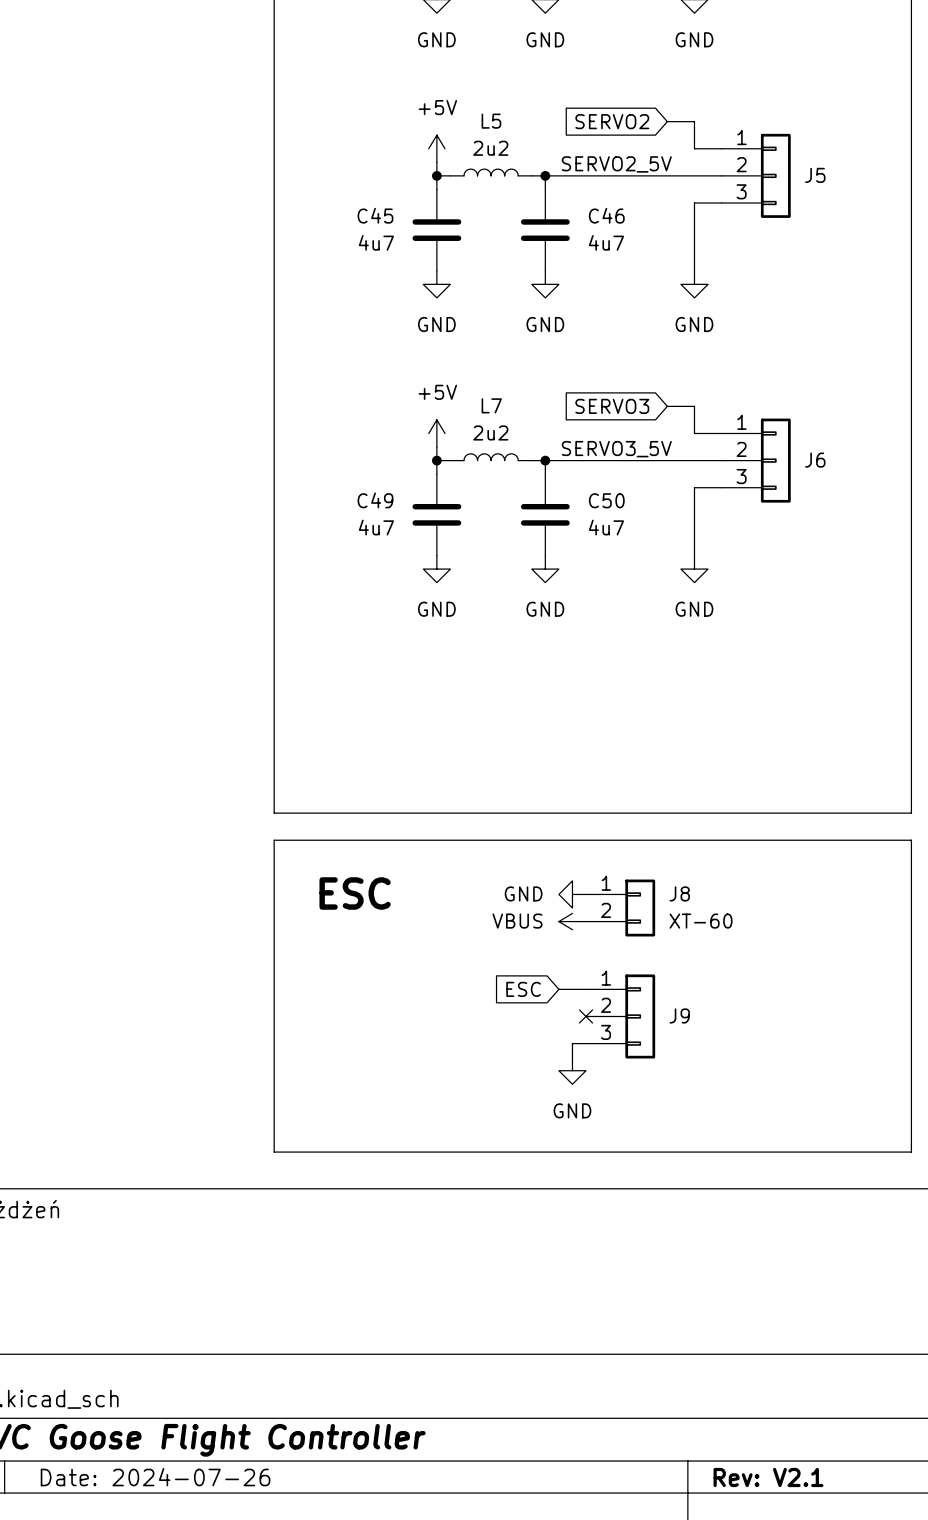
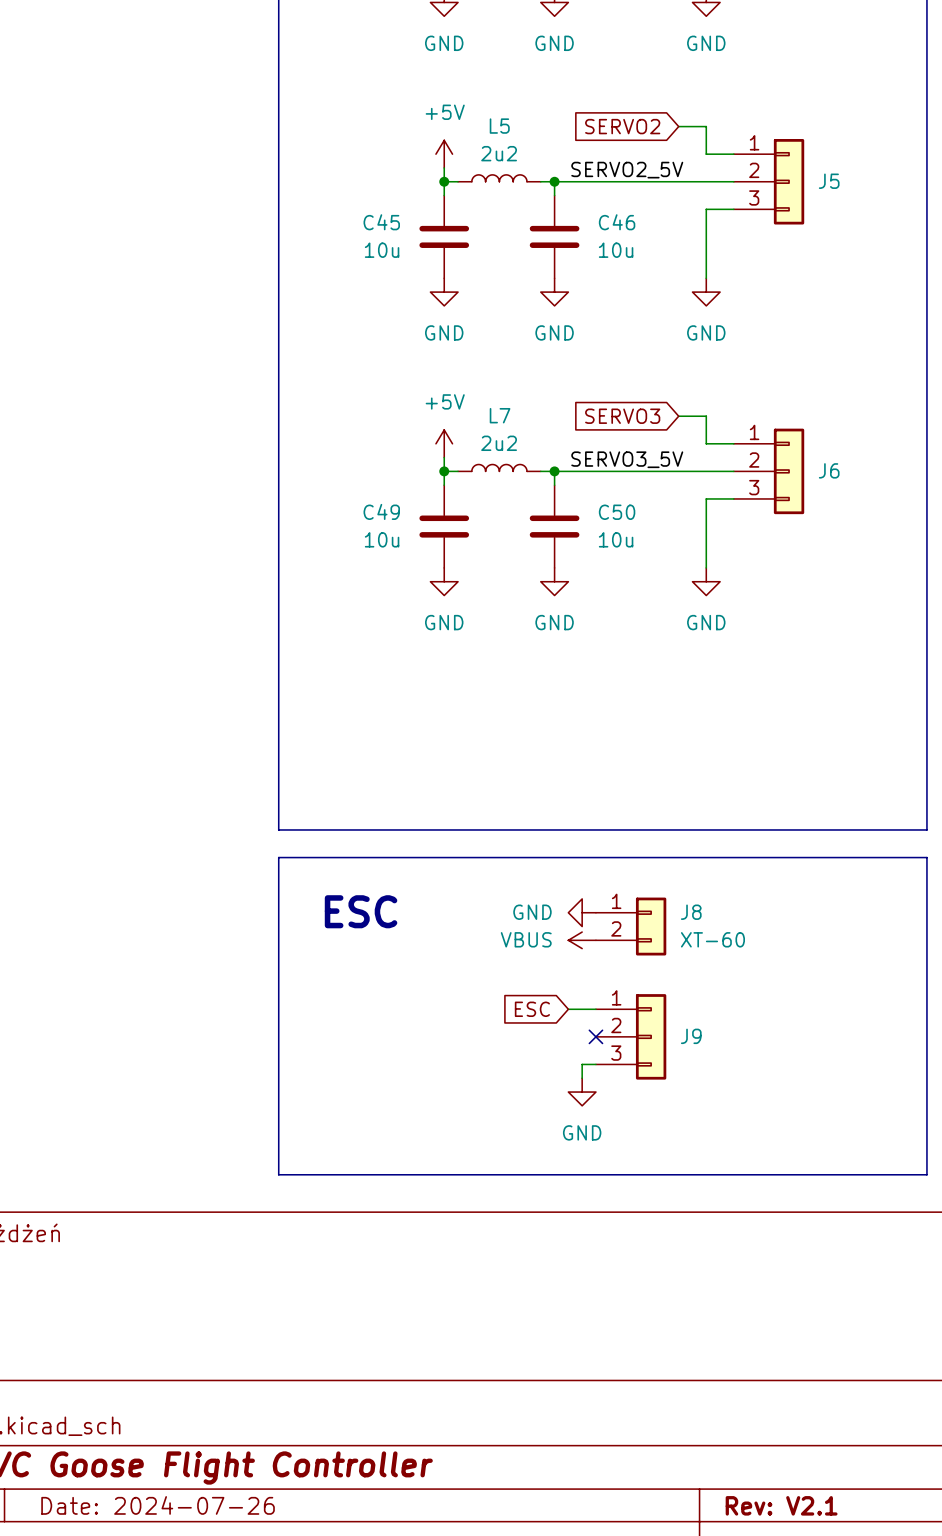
C45 value: 4u7 (376, 242) -> 10u (382, 250)
C46 value: 4u7 (606, 242) -> 10u (616, 250)
C49 value: 4u7 (376, 527) -> 10u (382, 539)
C50 value: 4u7 (606, 527) -> 10u (616, 539)

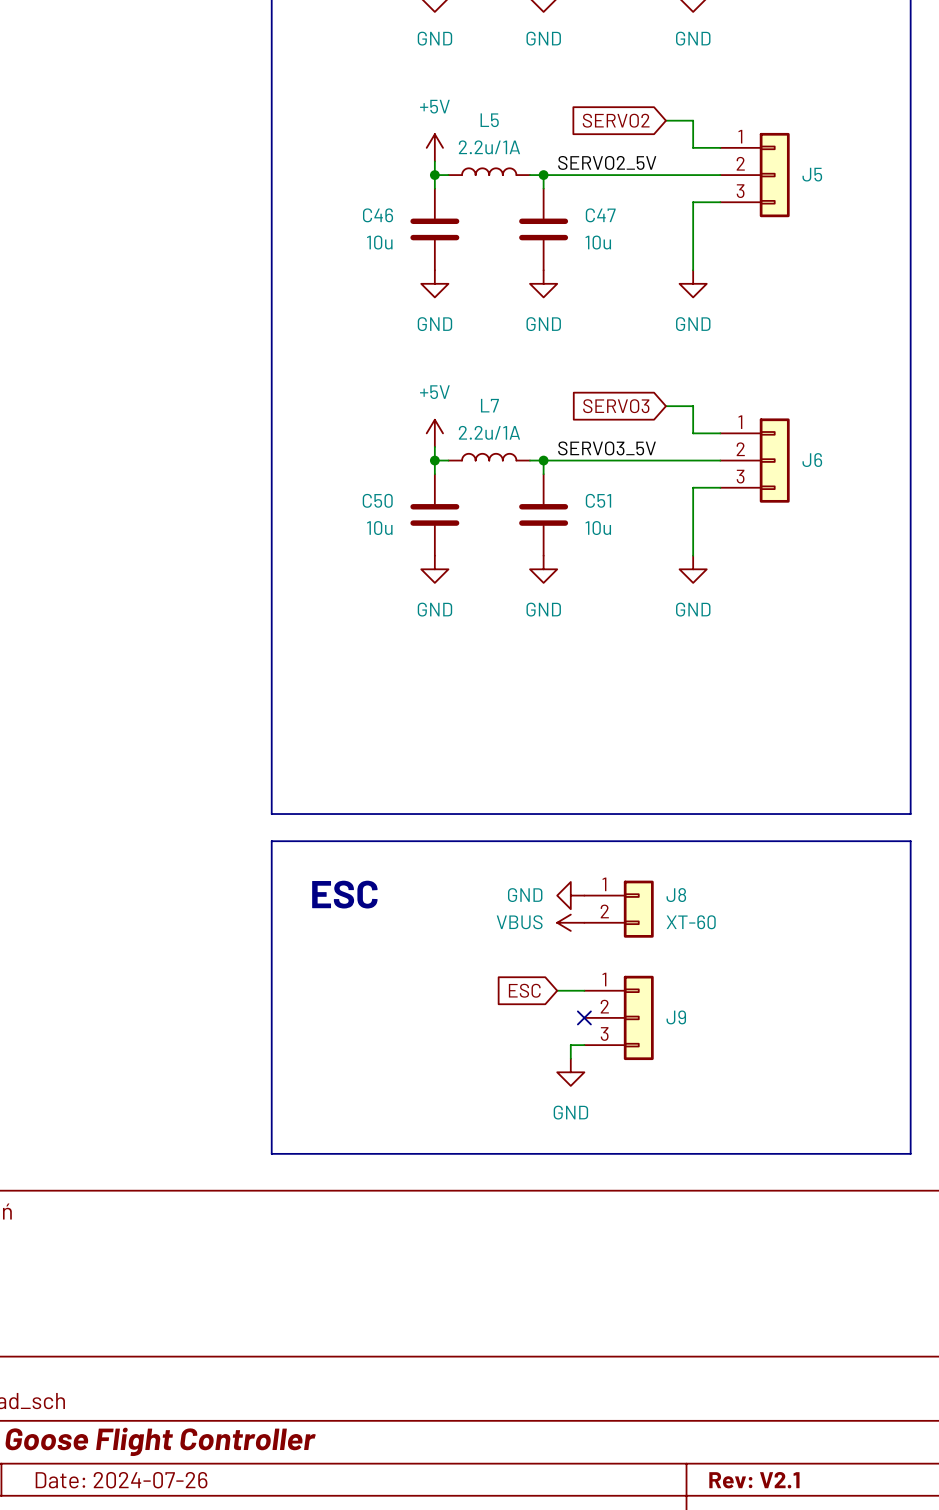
L5 value: 2u2 (499, 153) -> 2.2u/1A (489, 147)
C45 name: C45 (381, 222) -> C46 (378, 215)
C46 name: C46 (617, 222) -> C47 (600, 215)
L7 value: 2u2 (499, 443) -> 2.2u/1A (489, 432)
C49 name: C49 (381, 511) -> C50 (377, 500)
C50 name: C50 (617, 512) -> C51 (598, 500)

